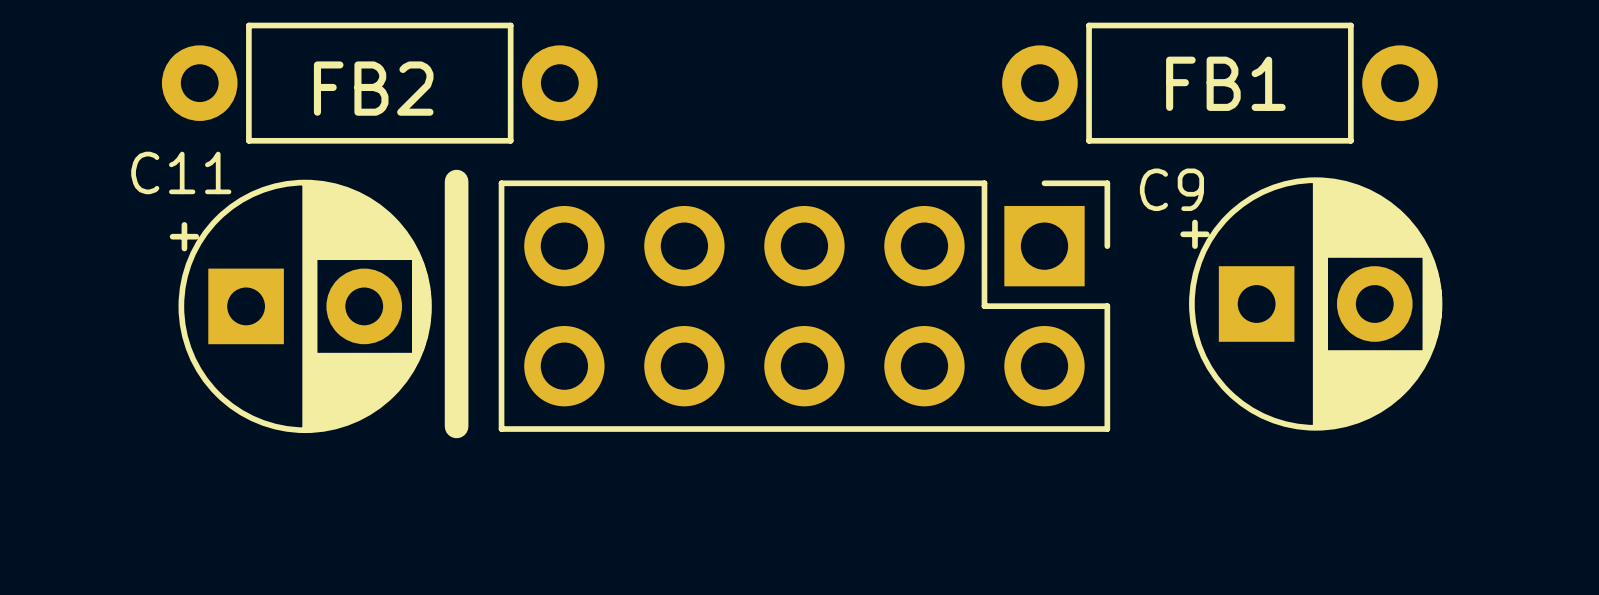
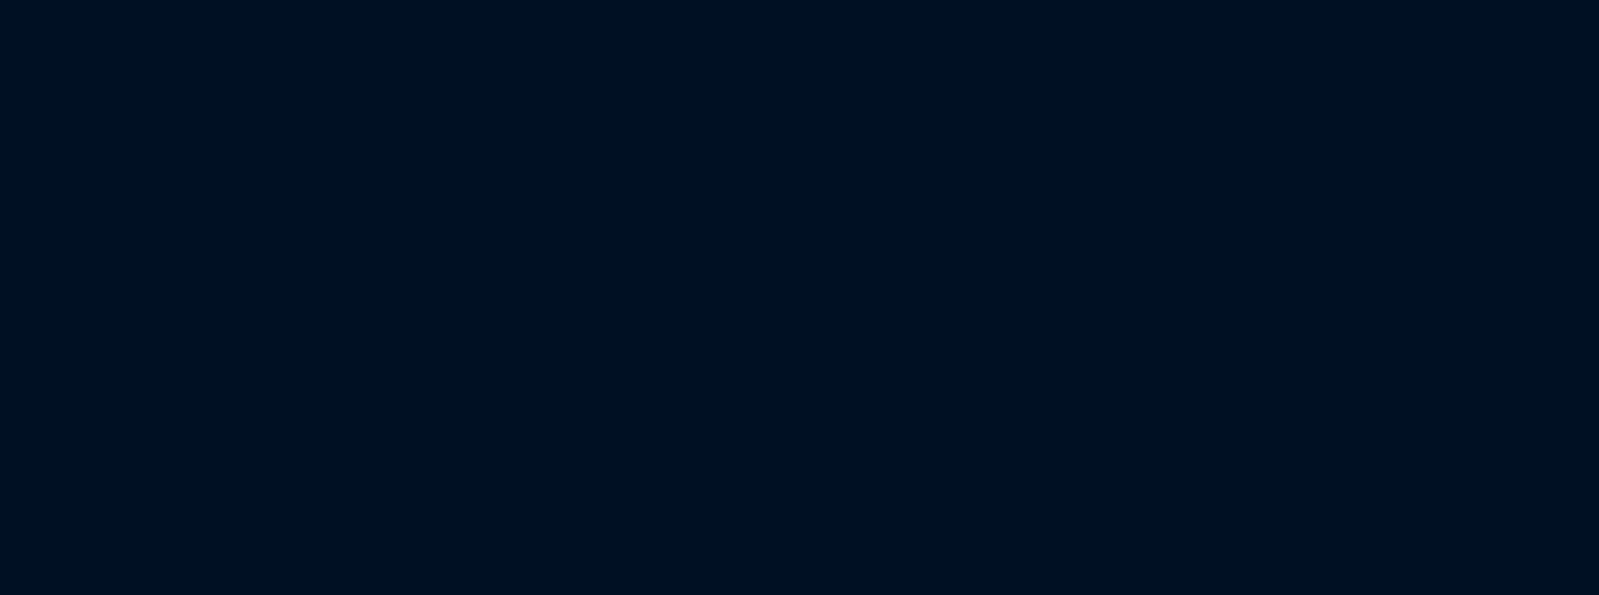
FB2: (379, 83) -> none
FB1: (1219, 83) -> none
line: (456, 181) (456, 426) -> none
C9: (1311, 304) -> none
C11: (300, 306) -> none
part: (804, 306) -> none

